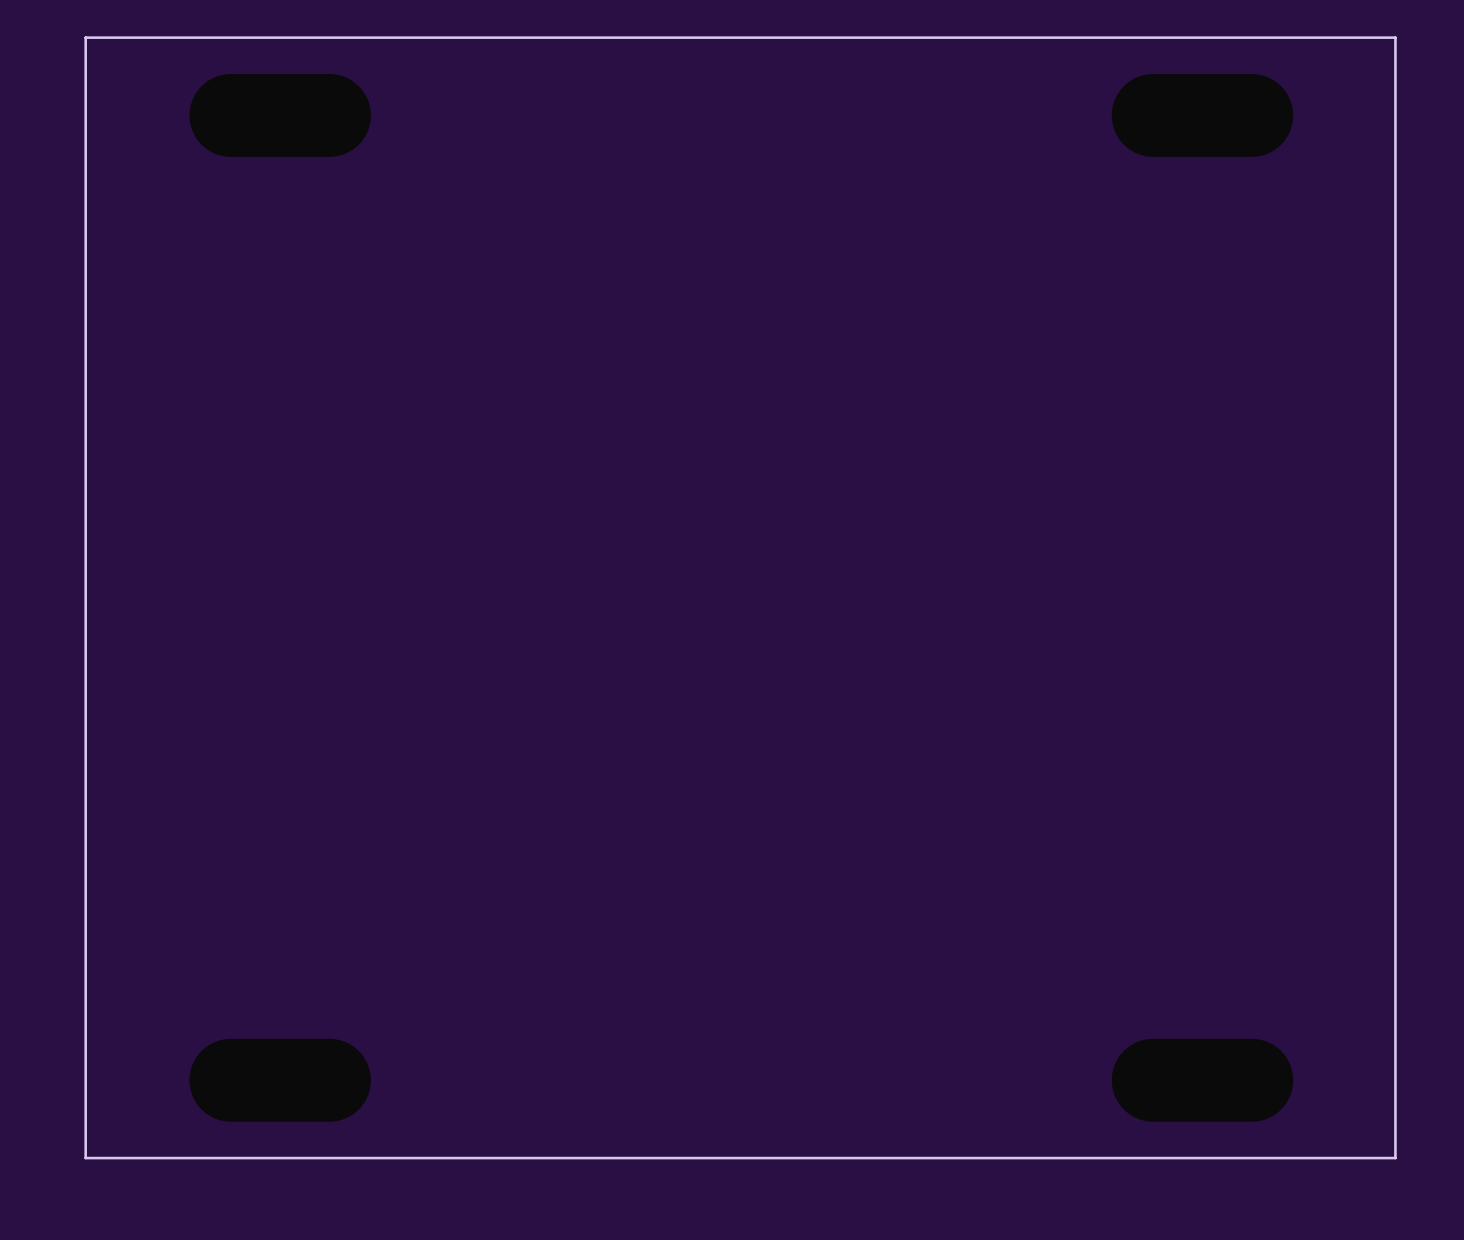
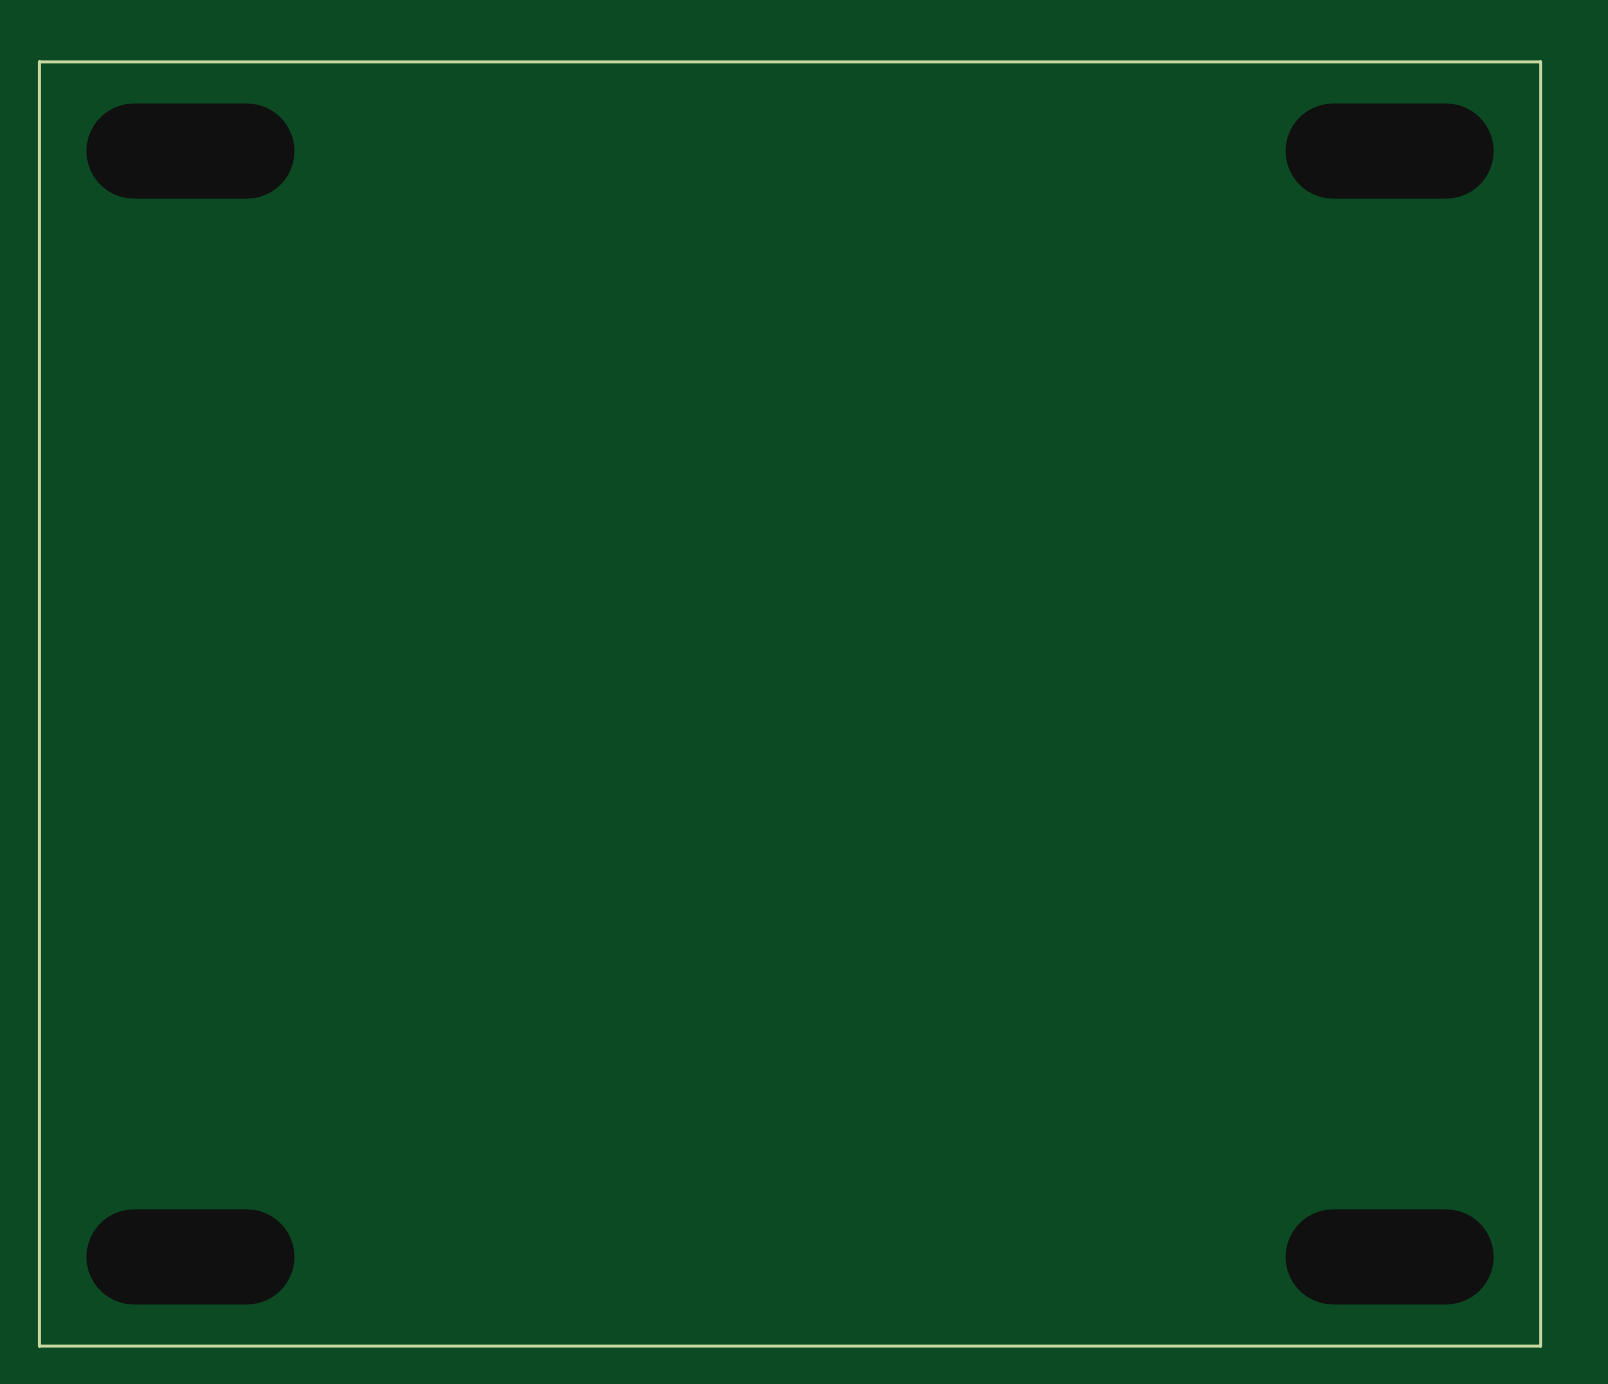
part position: (280, 115) -> (190, 151)
part position: (1202, 115) -> (1389, 151)
part position: (280, 1080) -> (190, 1256)
part position: (1202, 1080) -> (1389, 1256)

